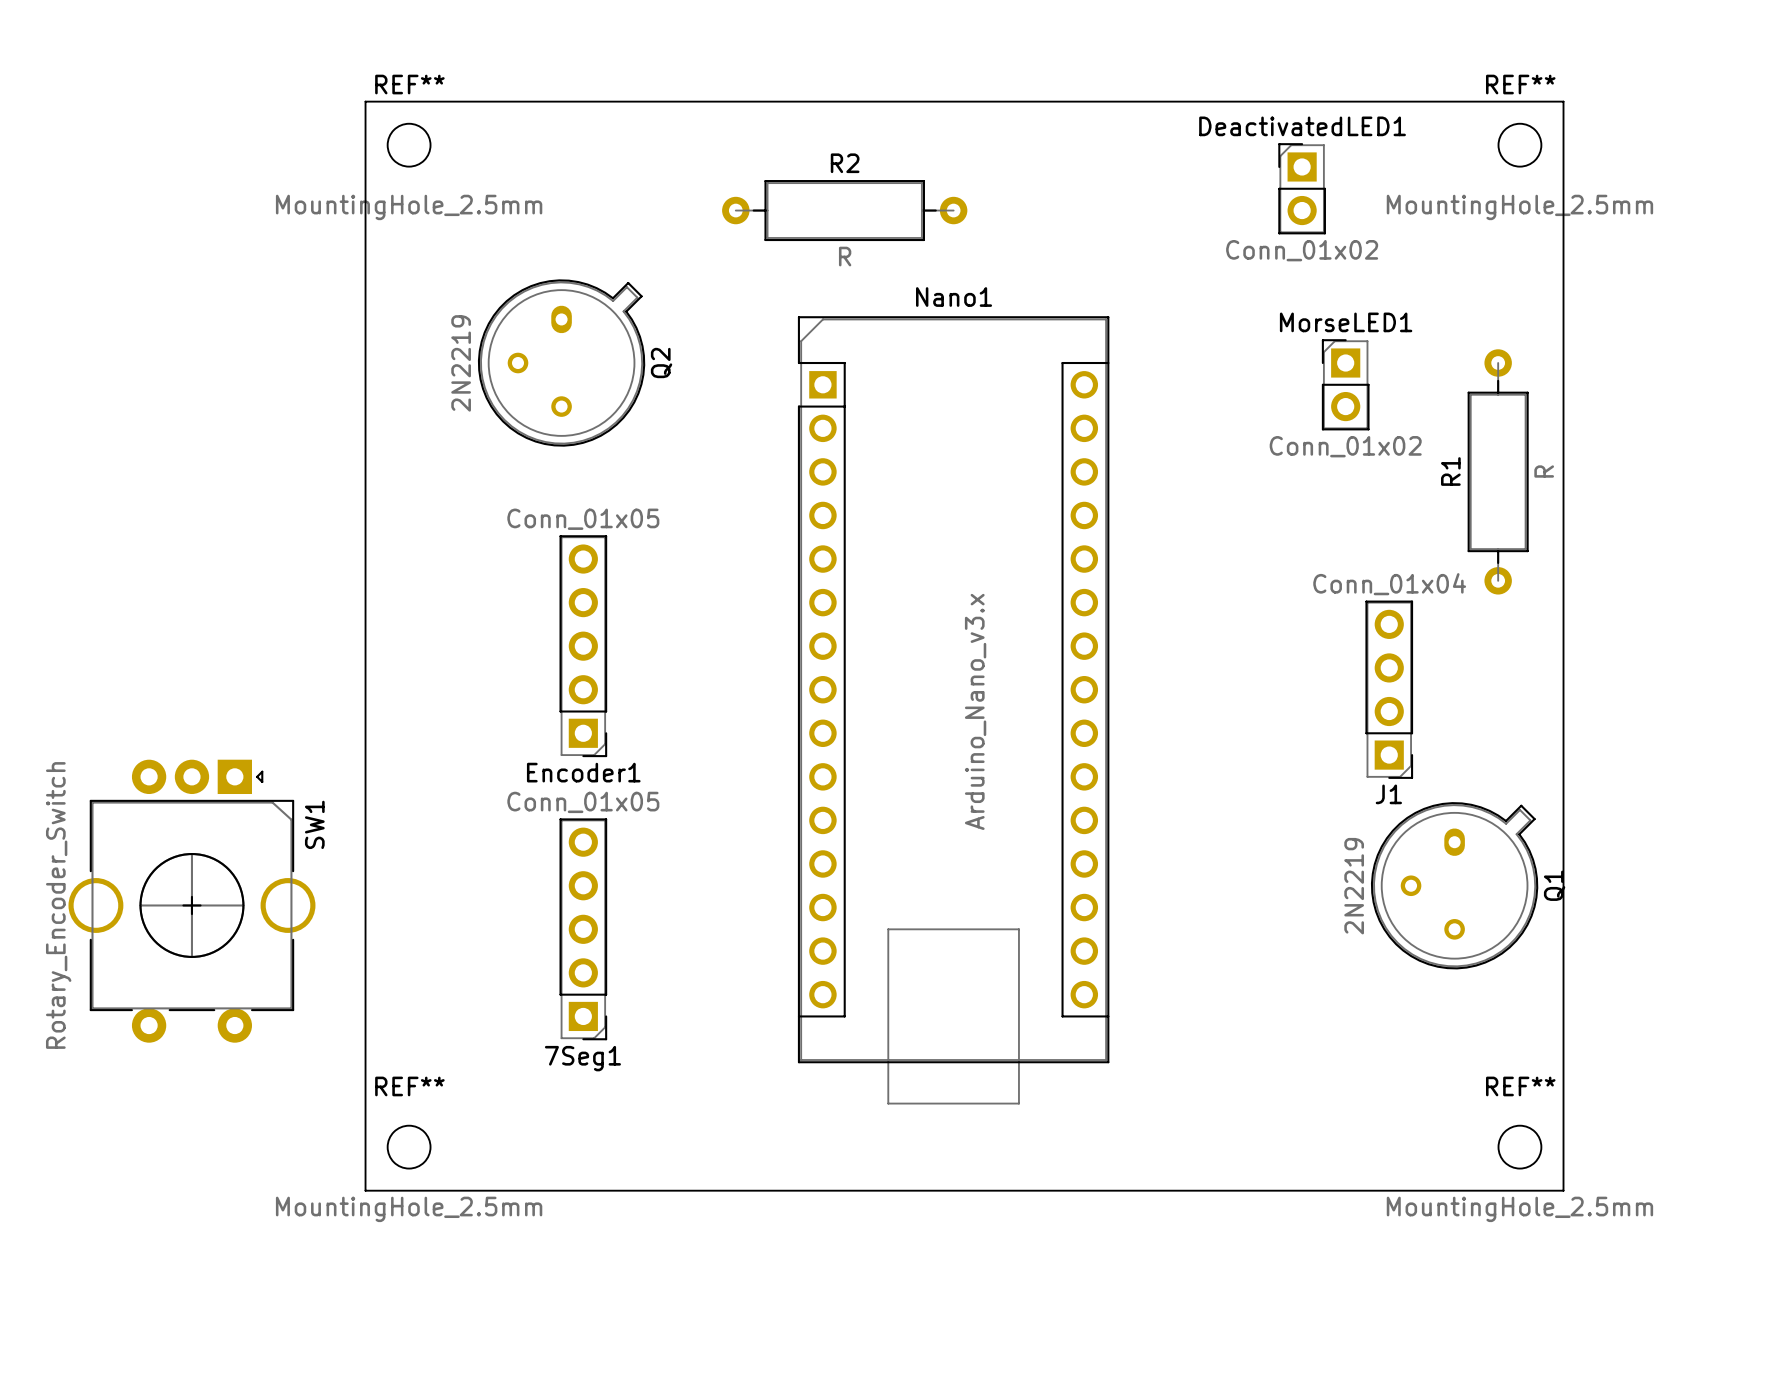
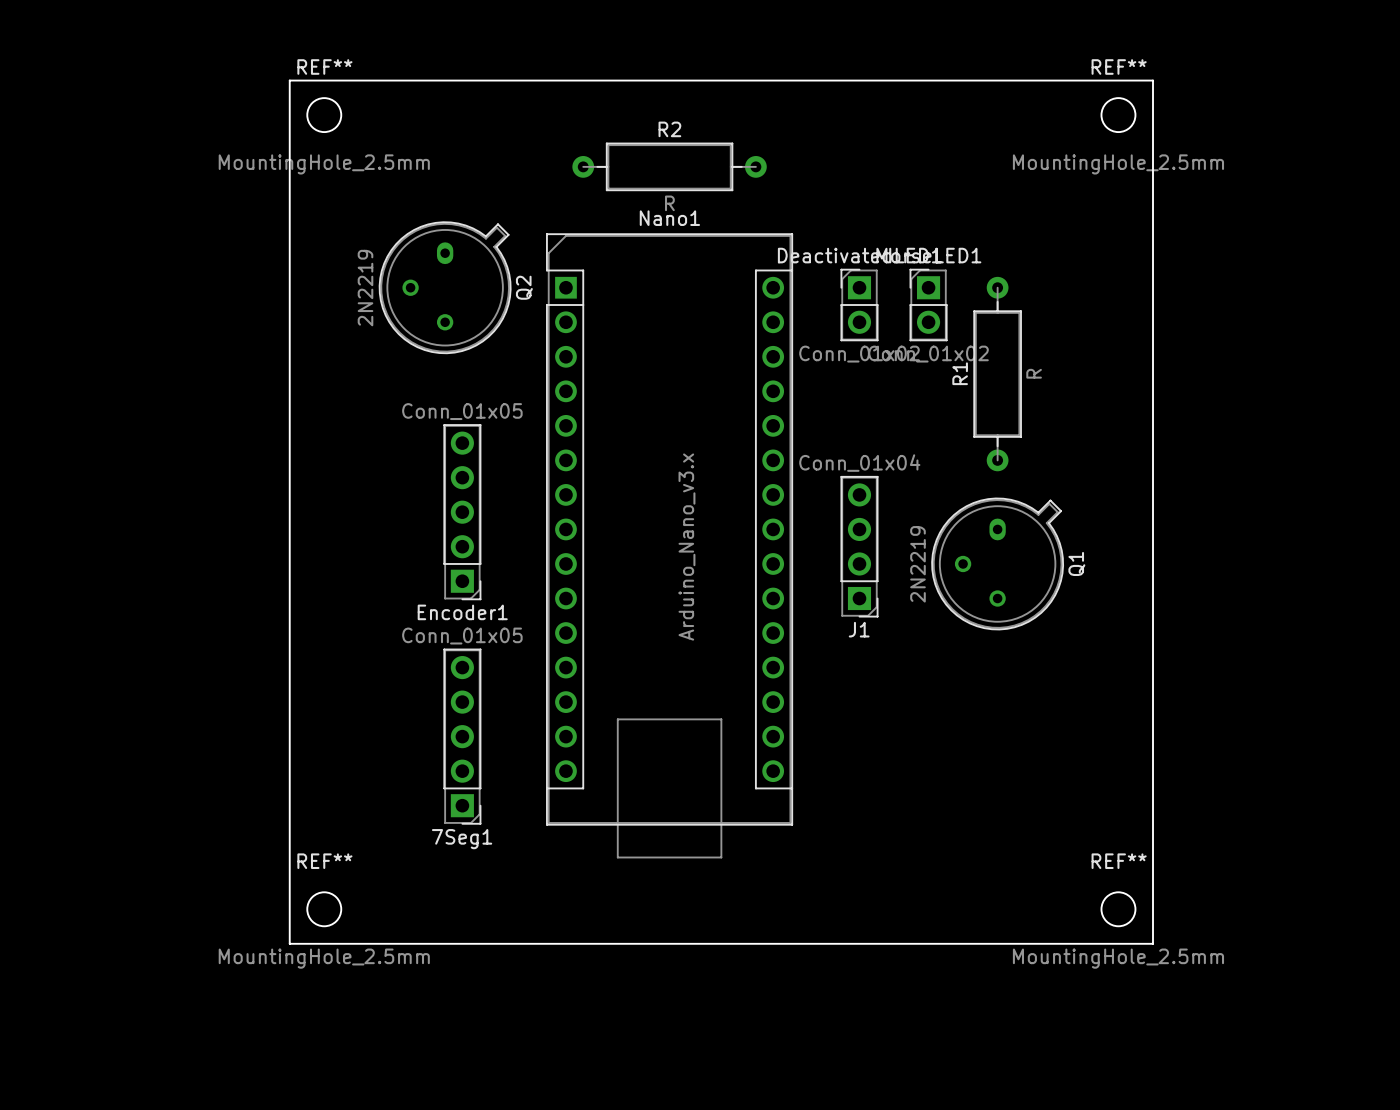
board edge: (1454, 101) (1563, 101) (1563, 1190) (1454, 1190) -> (1152, 80) (1152, 943)
REF** position: (1519, 145) -> (1118, 115)
DeactivatedLED1 position: (1302, 188) -> (859, 305)
MorseLED1 position: (1345, 384) -> (928, 305)
R1 position: (1498, 471) -> (997, 374)
J1 position: (1389, 689) -> (859, 546)
Nano1 position: (953, 710) -> (669, 545)
Q1 position: (1454, 885) -> (997, 563)
SW1: Rotary_Encoder_Switch (191, 901) -> none
REF** position: (1519, 1147) -> (1118, 909)

